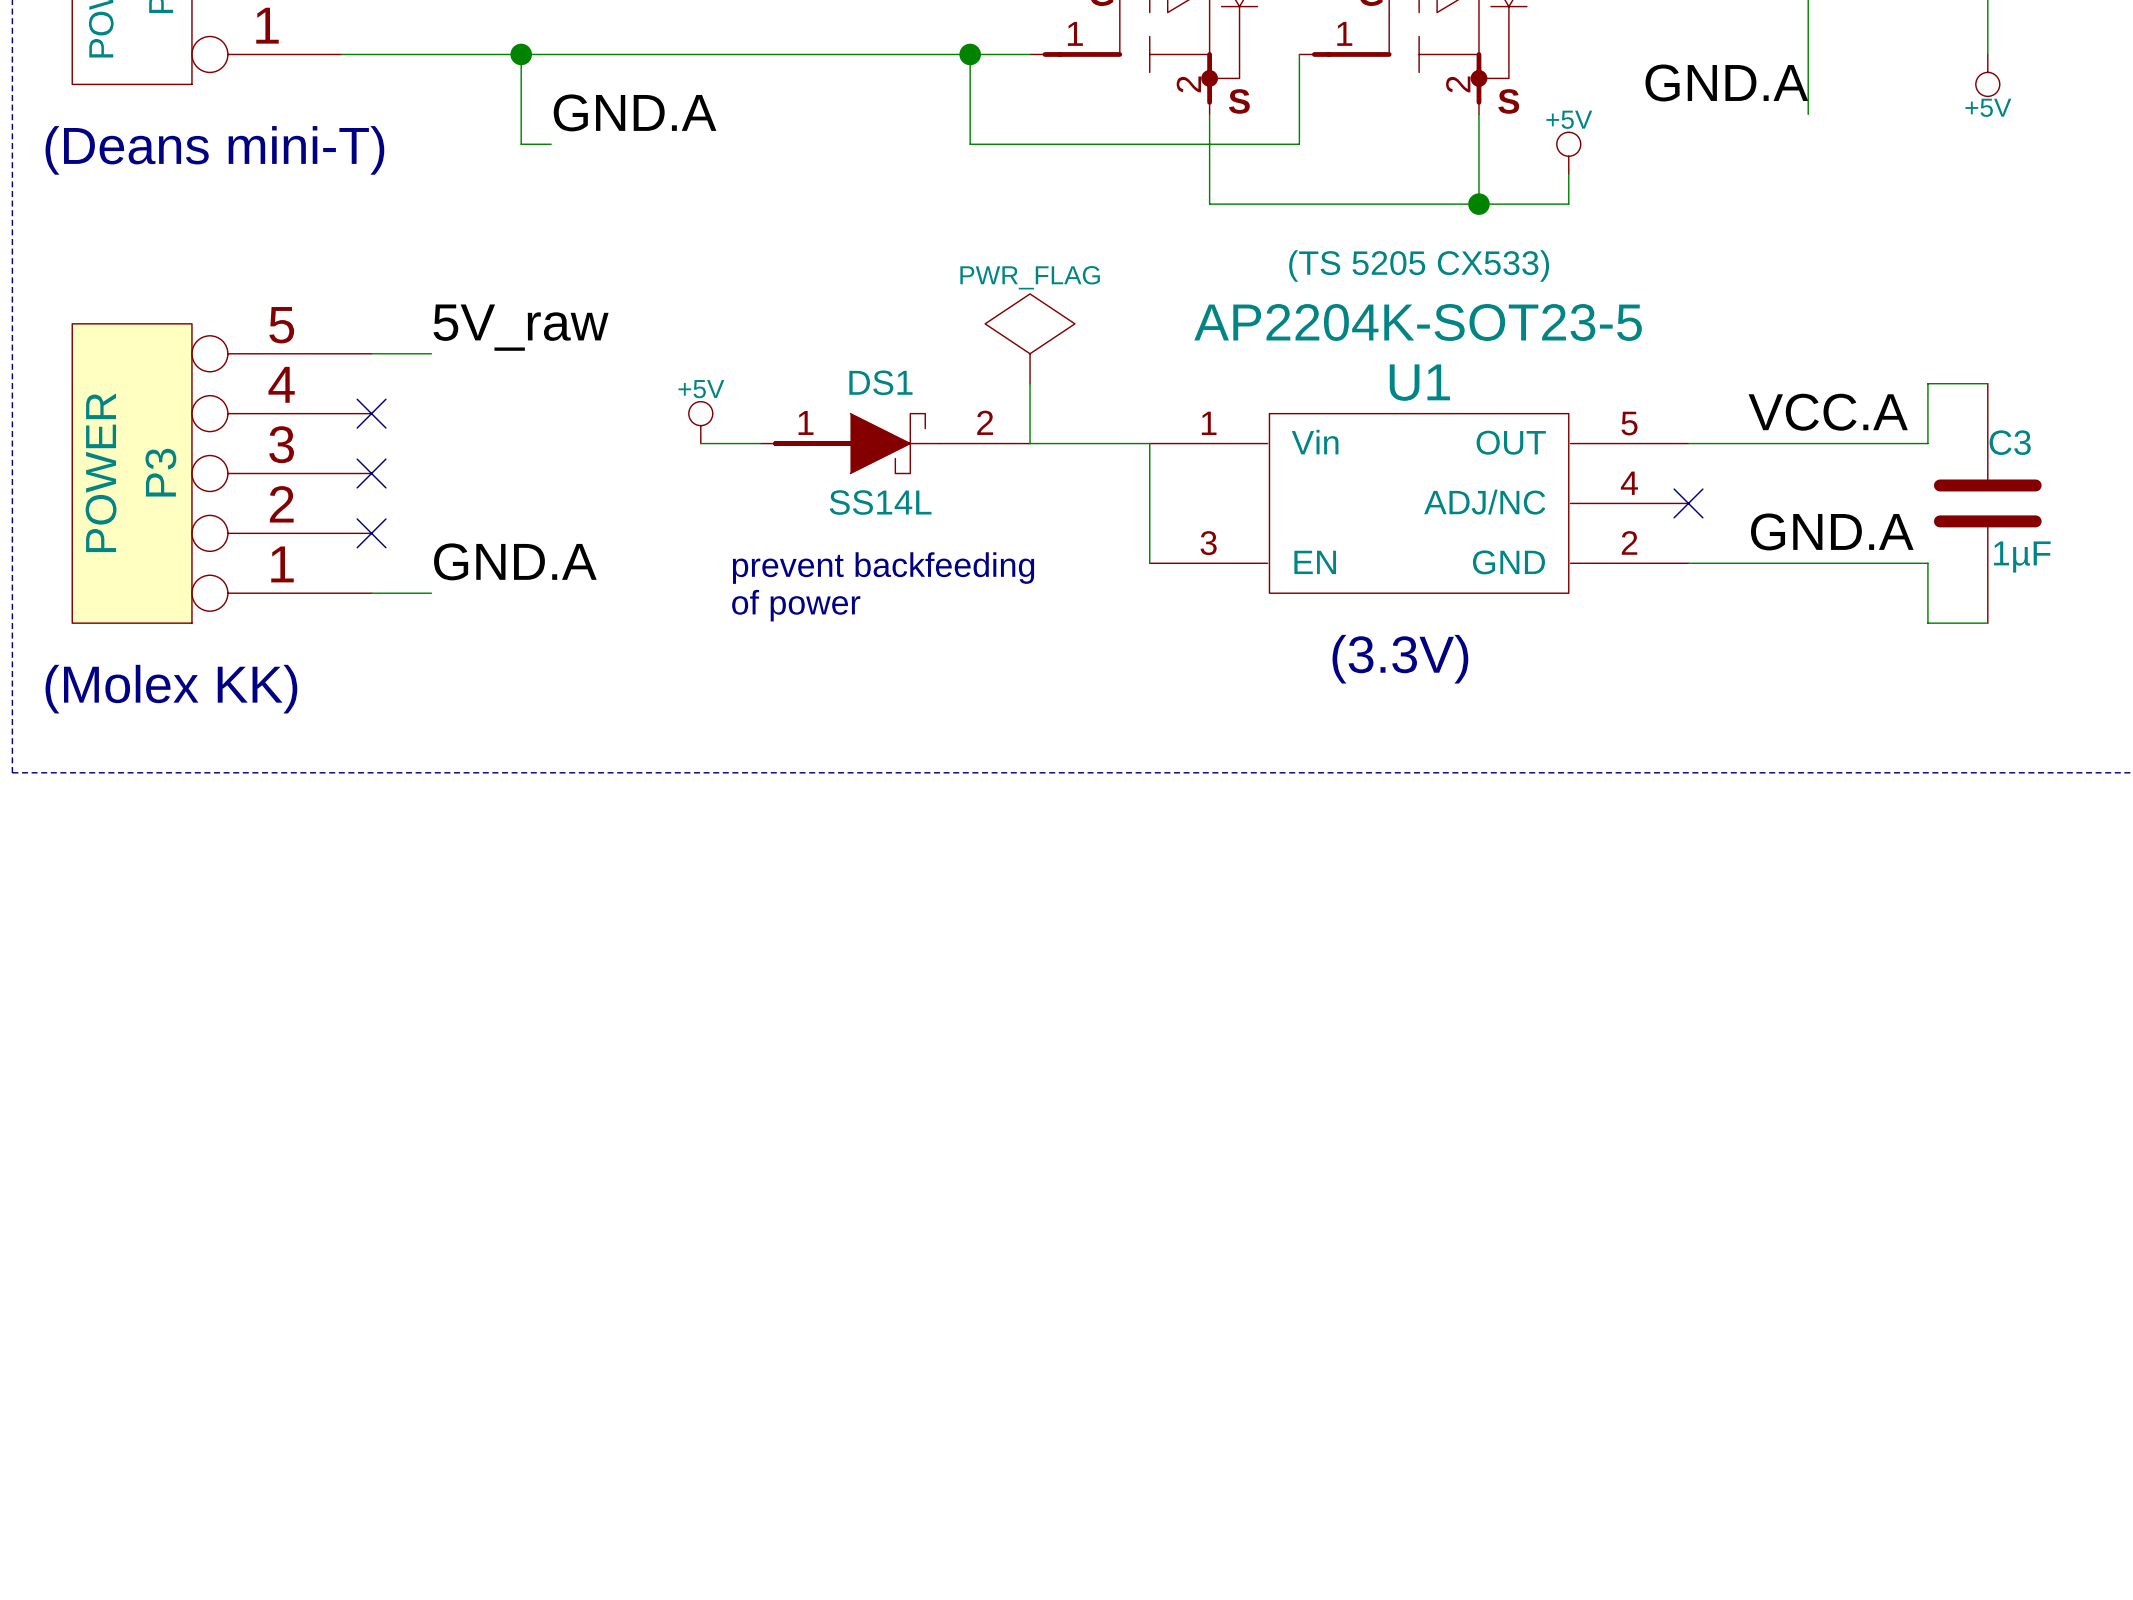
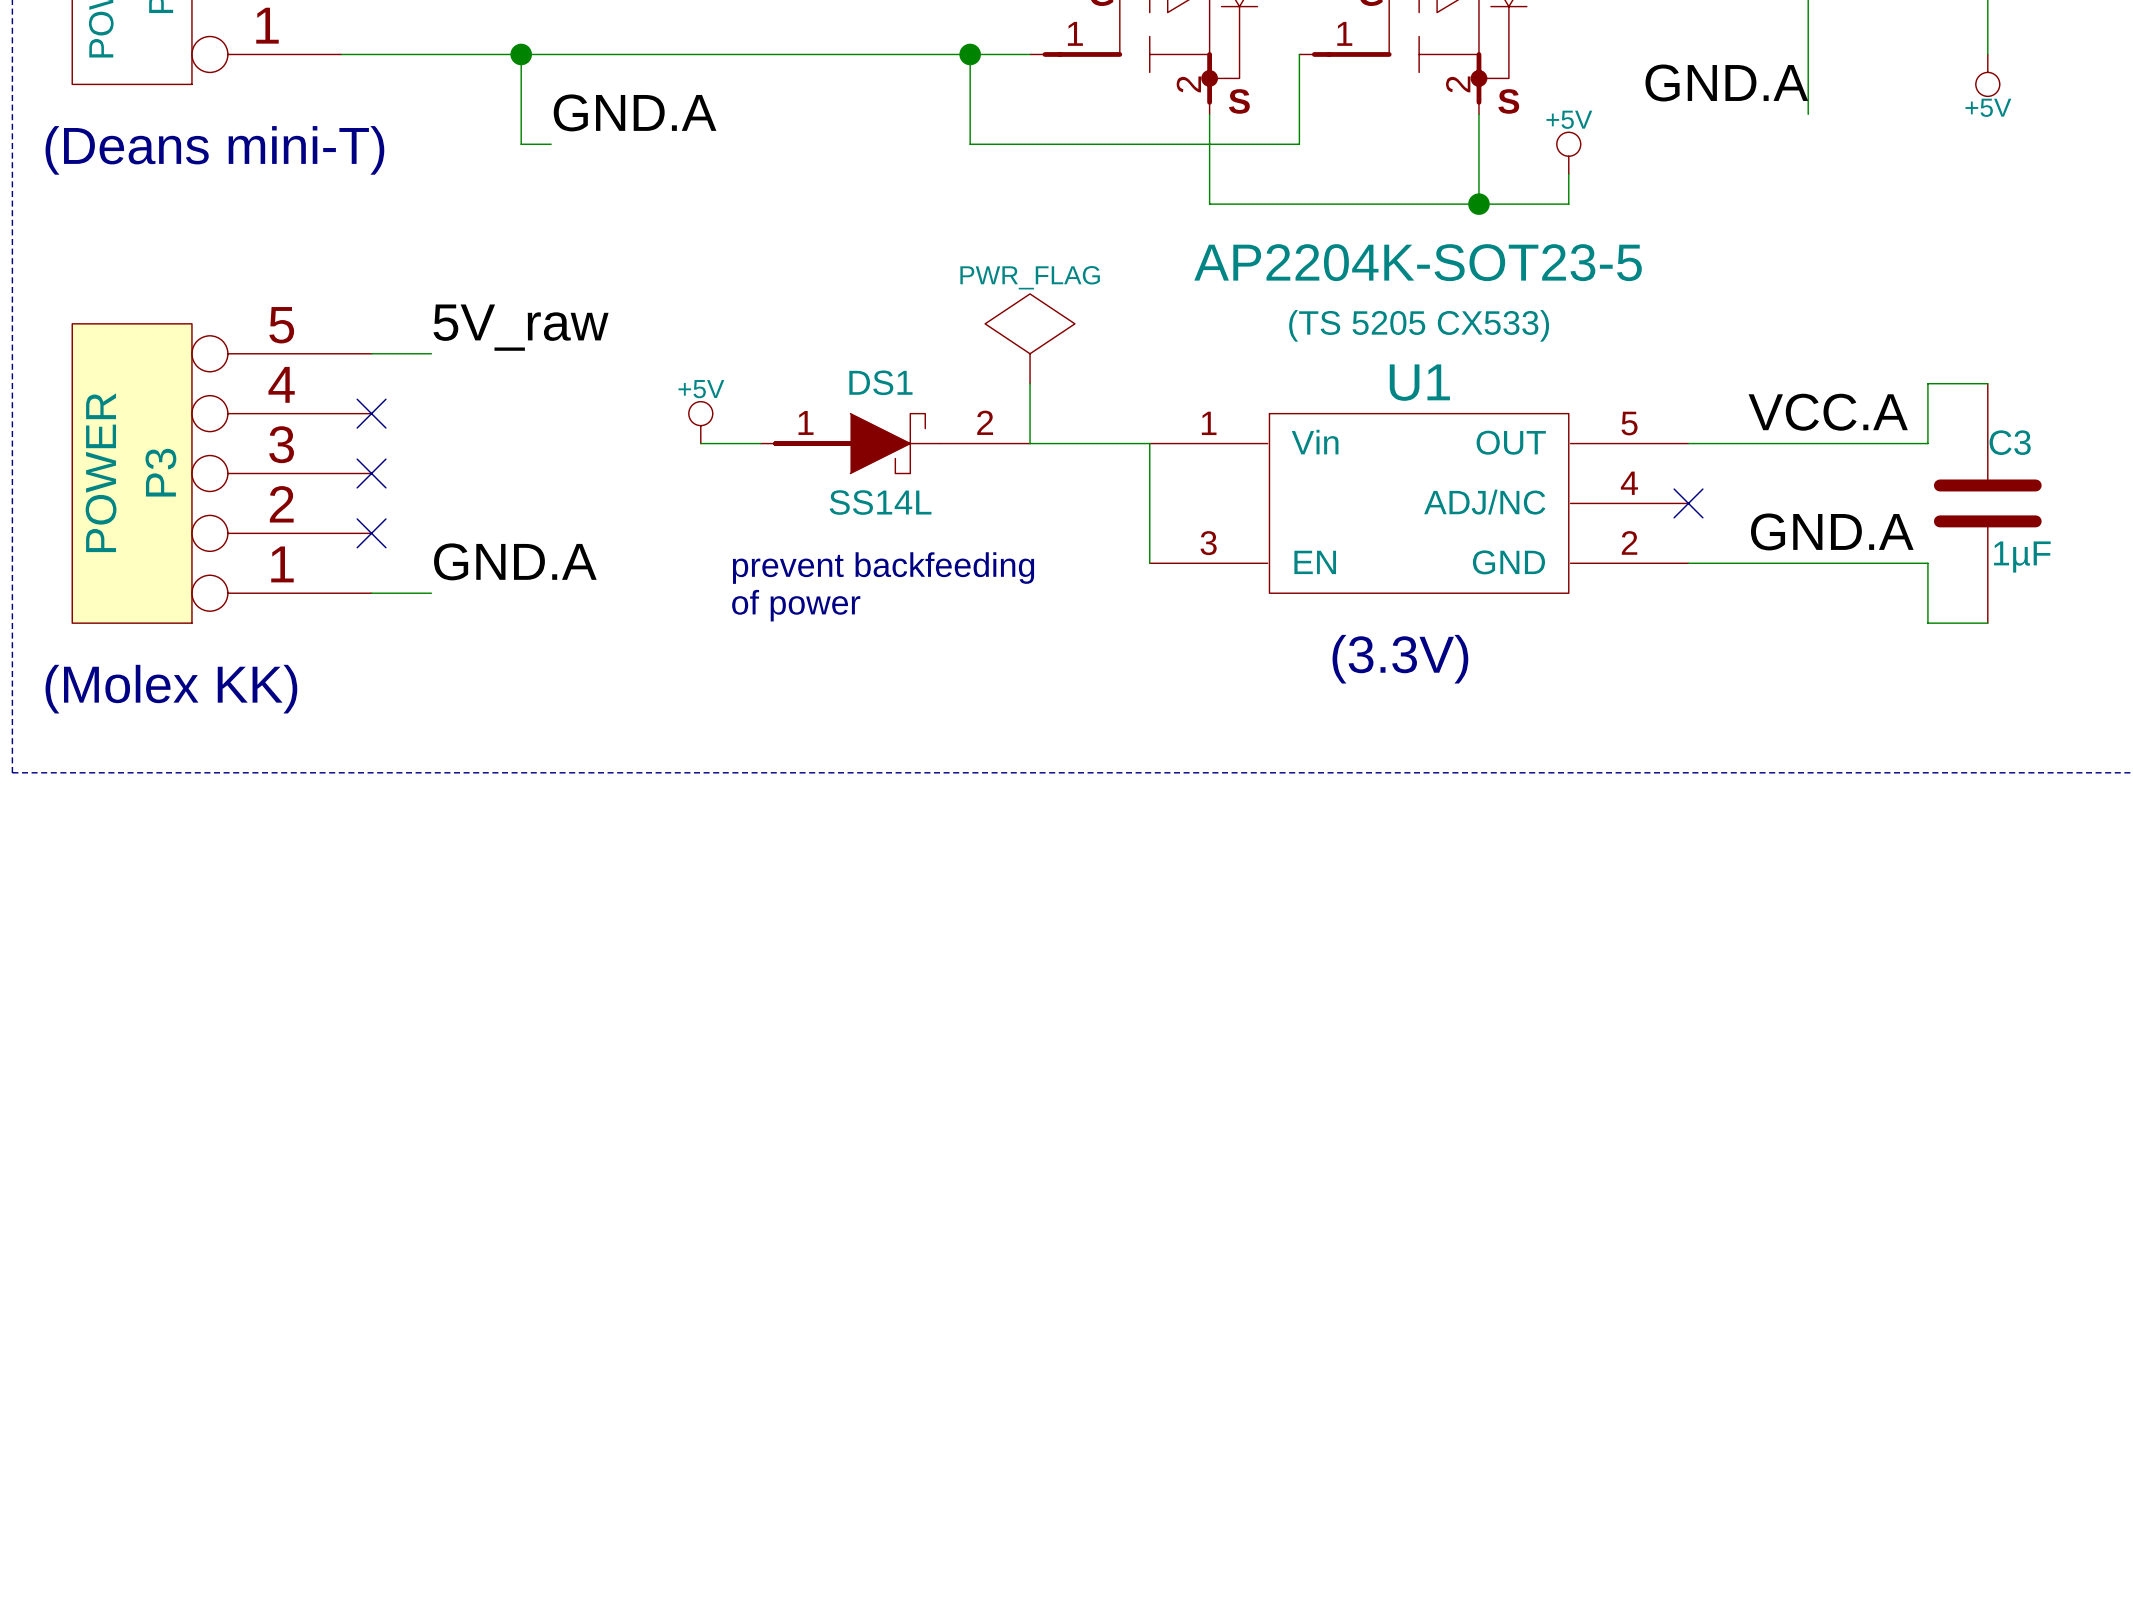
U1 text position: (TS 5205 CX533) (1419, 266) -> (TS 5205 CX533) (1419, 325)
U1 value position: AP2204K-SOT23-5 (1418, 322) -> AP2204K-SOT23-5 (1418, 262)

